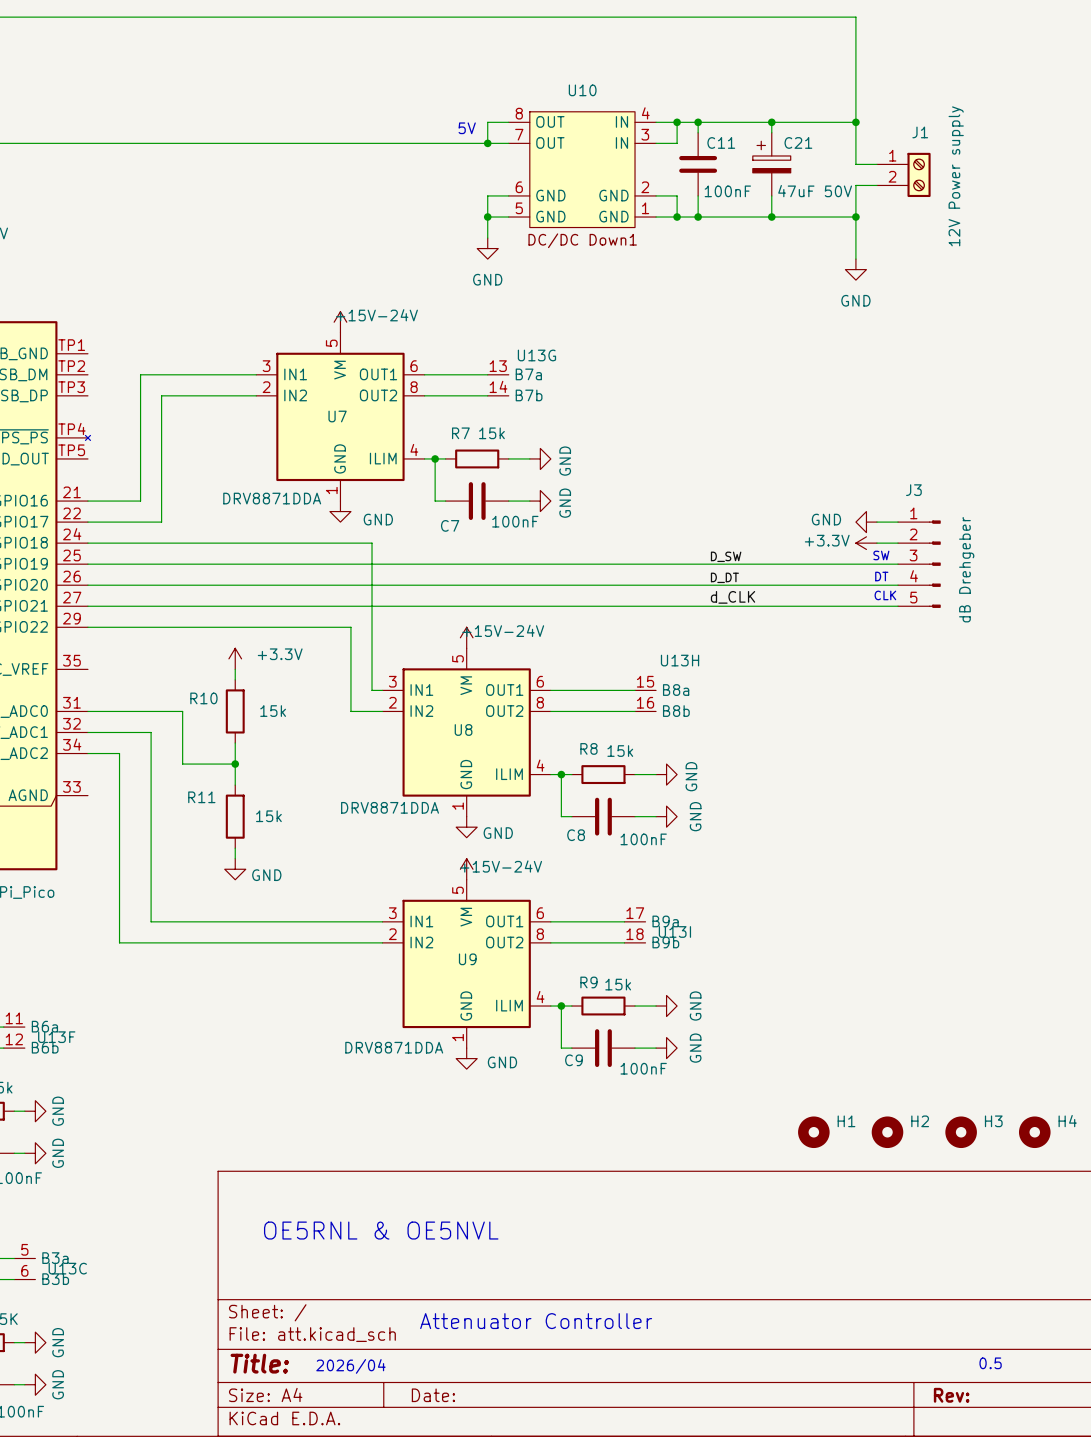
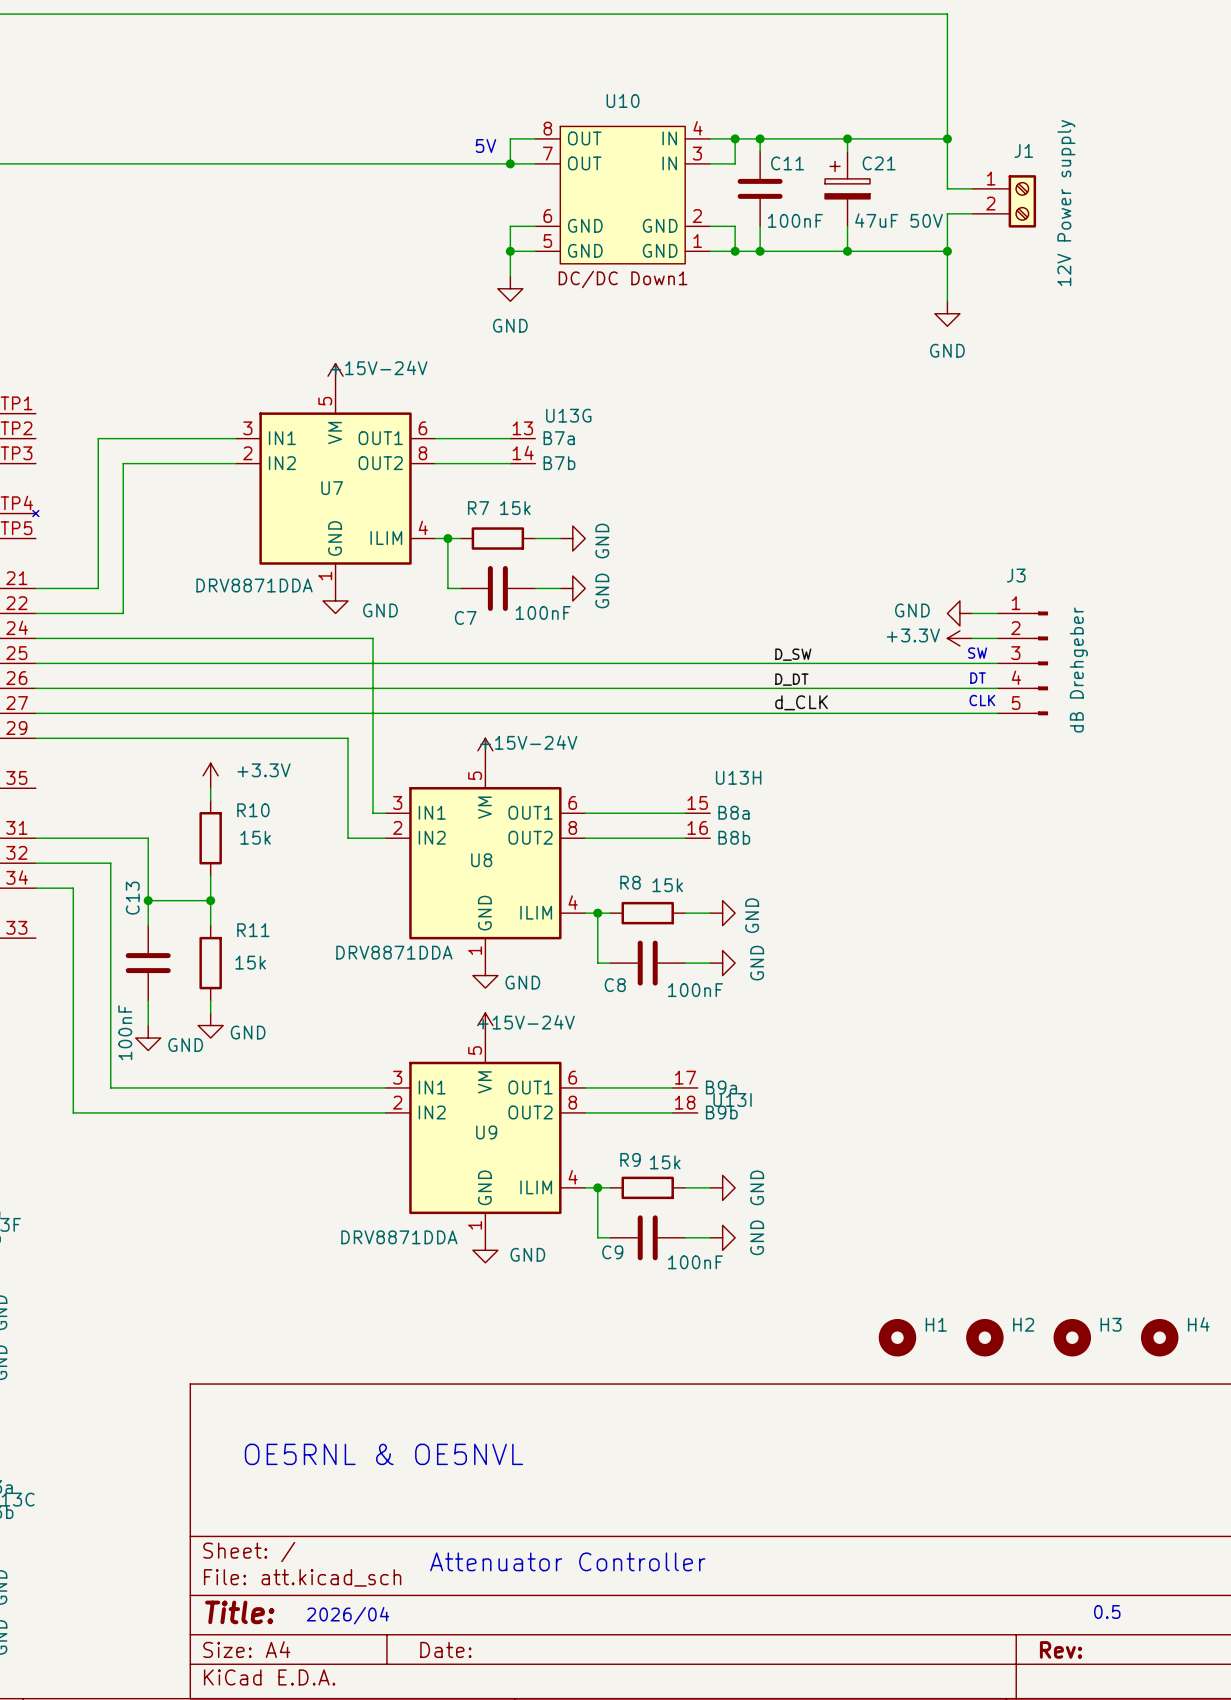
R10 name position: R10 (203, 698) -> R10 (253, 810)
wire: none -> (148, 900) (148, 925)
junction: none -> (148, 900)
R11 name position: R11 (201, 797) -> R11 (253, 930)
C13: none -> 100nF (148, 963)
wire: none -> (148, 1000) (148, 1025)
power symbol: none -> GND (148, 1038)

